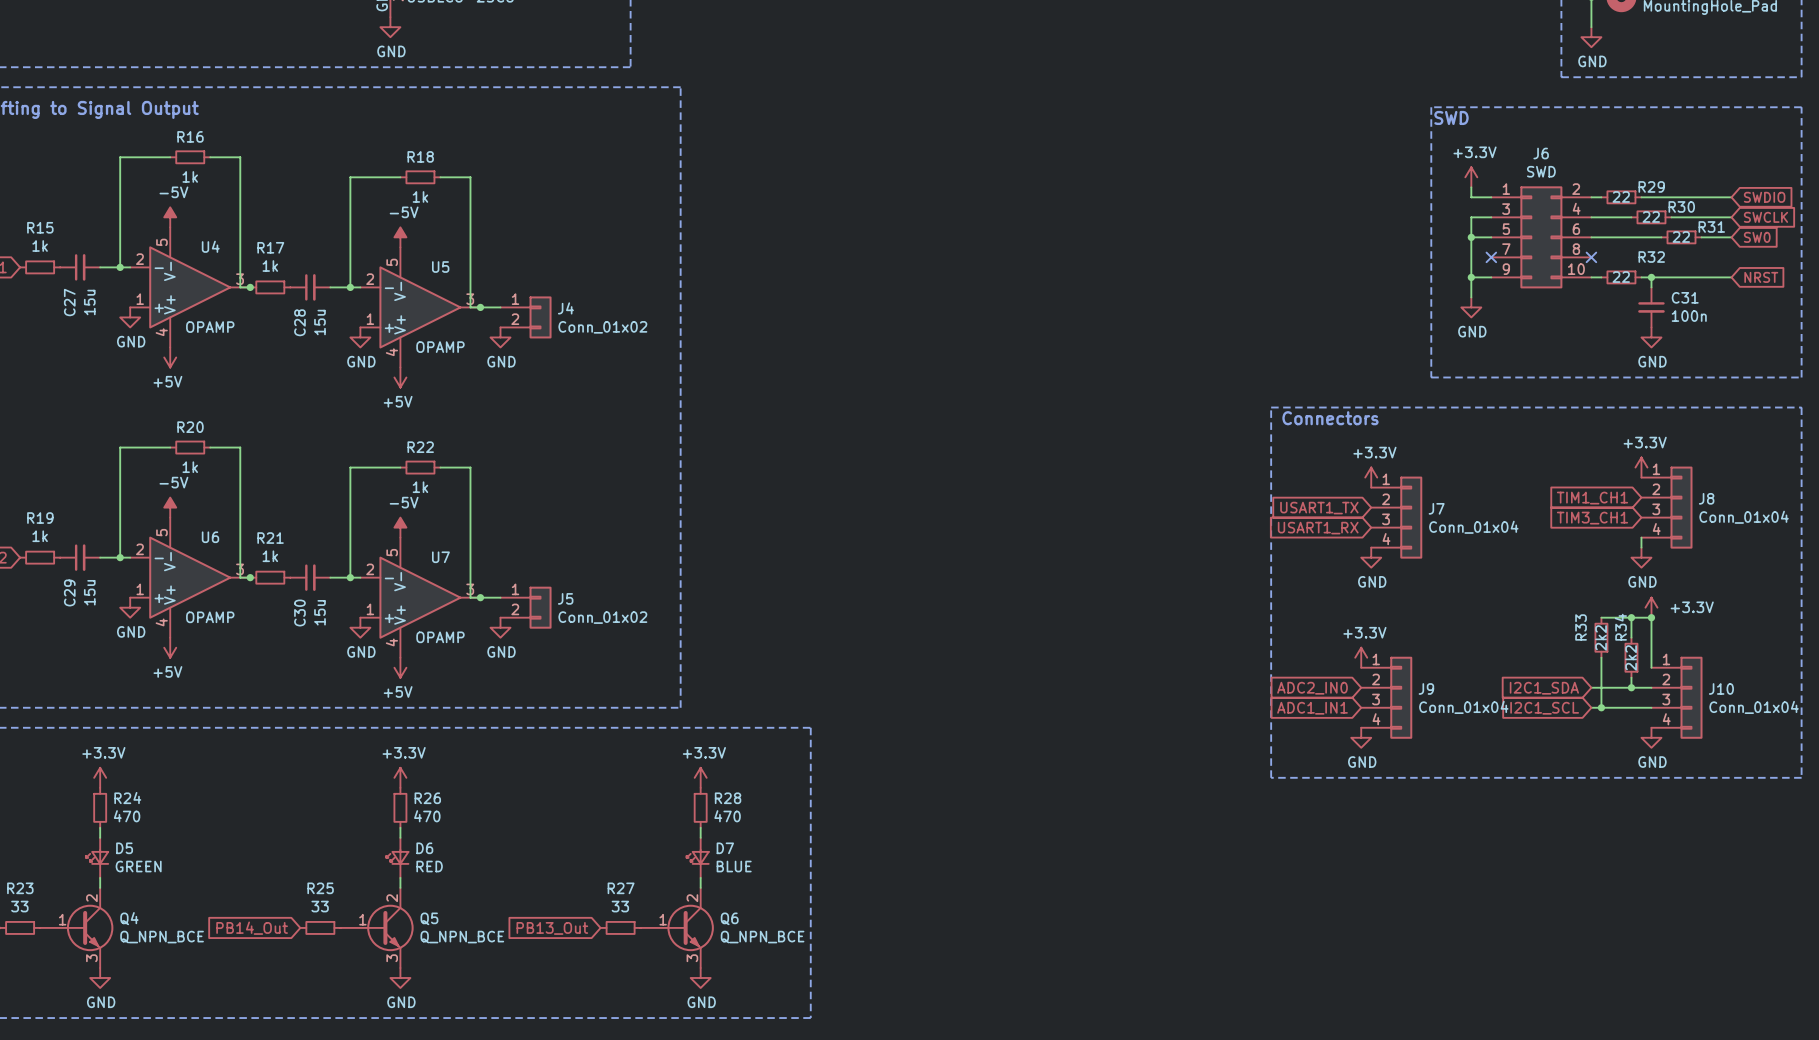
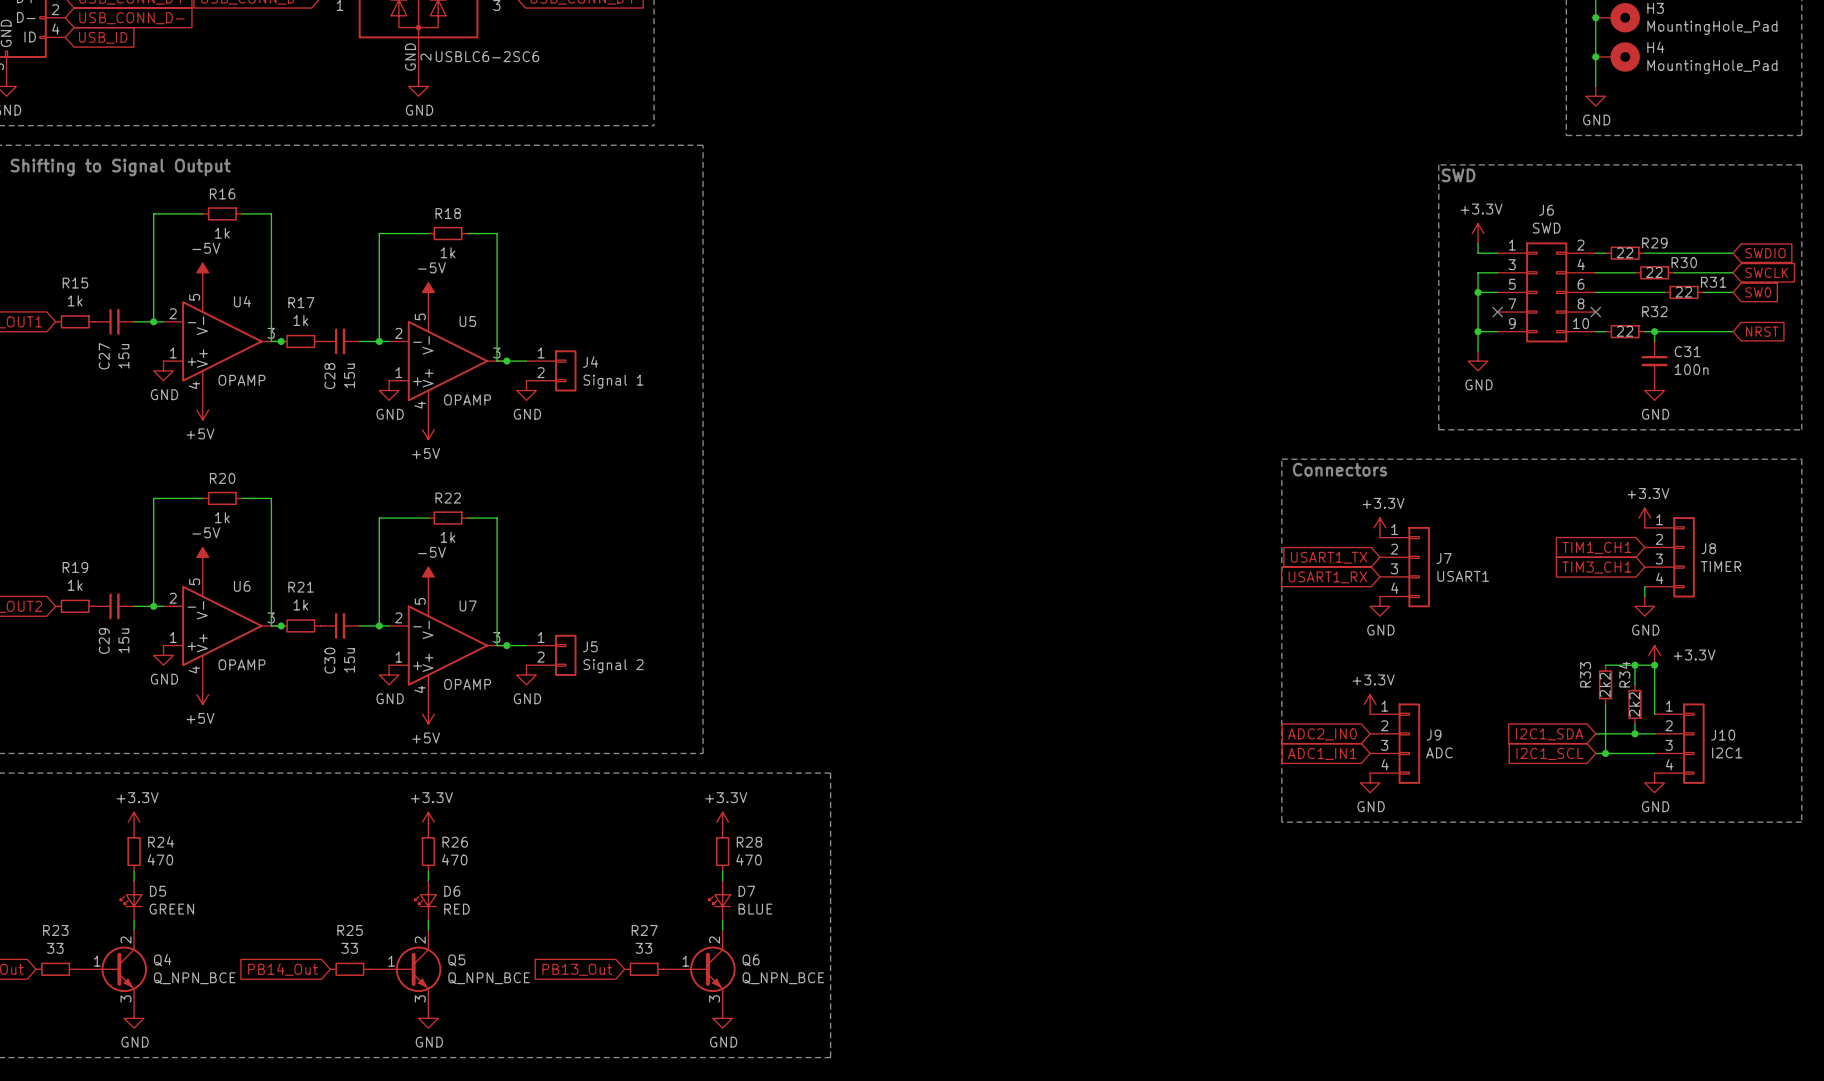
J4 value: Conn_01x02 (602, 327) -> Signal 1 (613, 381)
J8 value: Conn_01x04 (1744, 517) -> TIMER (1721, 566)
J7 value: Conn_01x04 (1473, 527) -> USART1 (1463, 576)
J5 value: Conn_01x02 (602, 617) -> Signal 2 (613, 666)
J9 value: Conn_01x04 (1463, 707) -> ADC (1439, 752)
J10 value: Conn_01x04 (1754, 707) -> I2C1 (1727, 752)

